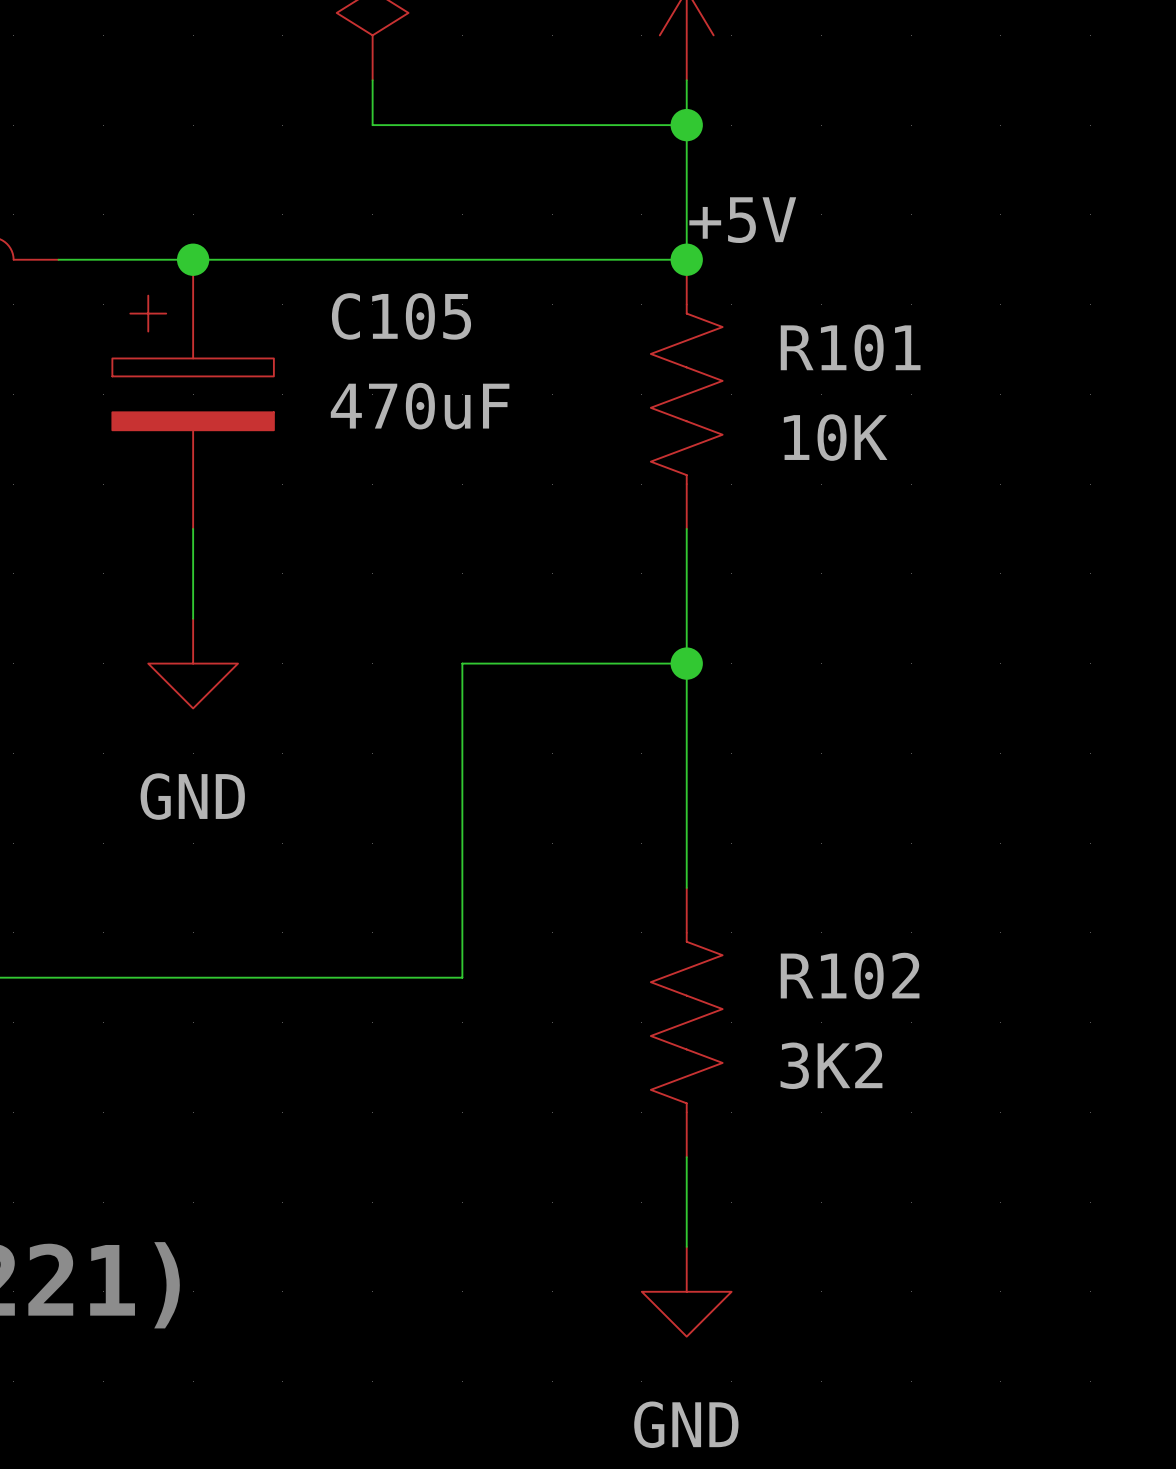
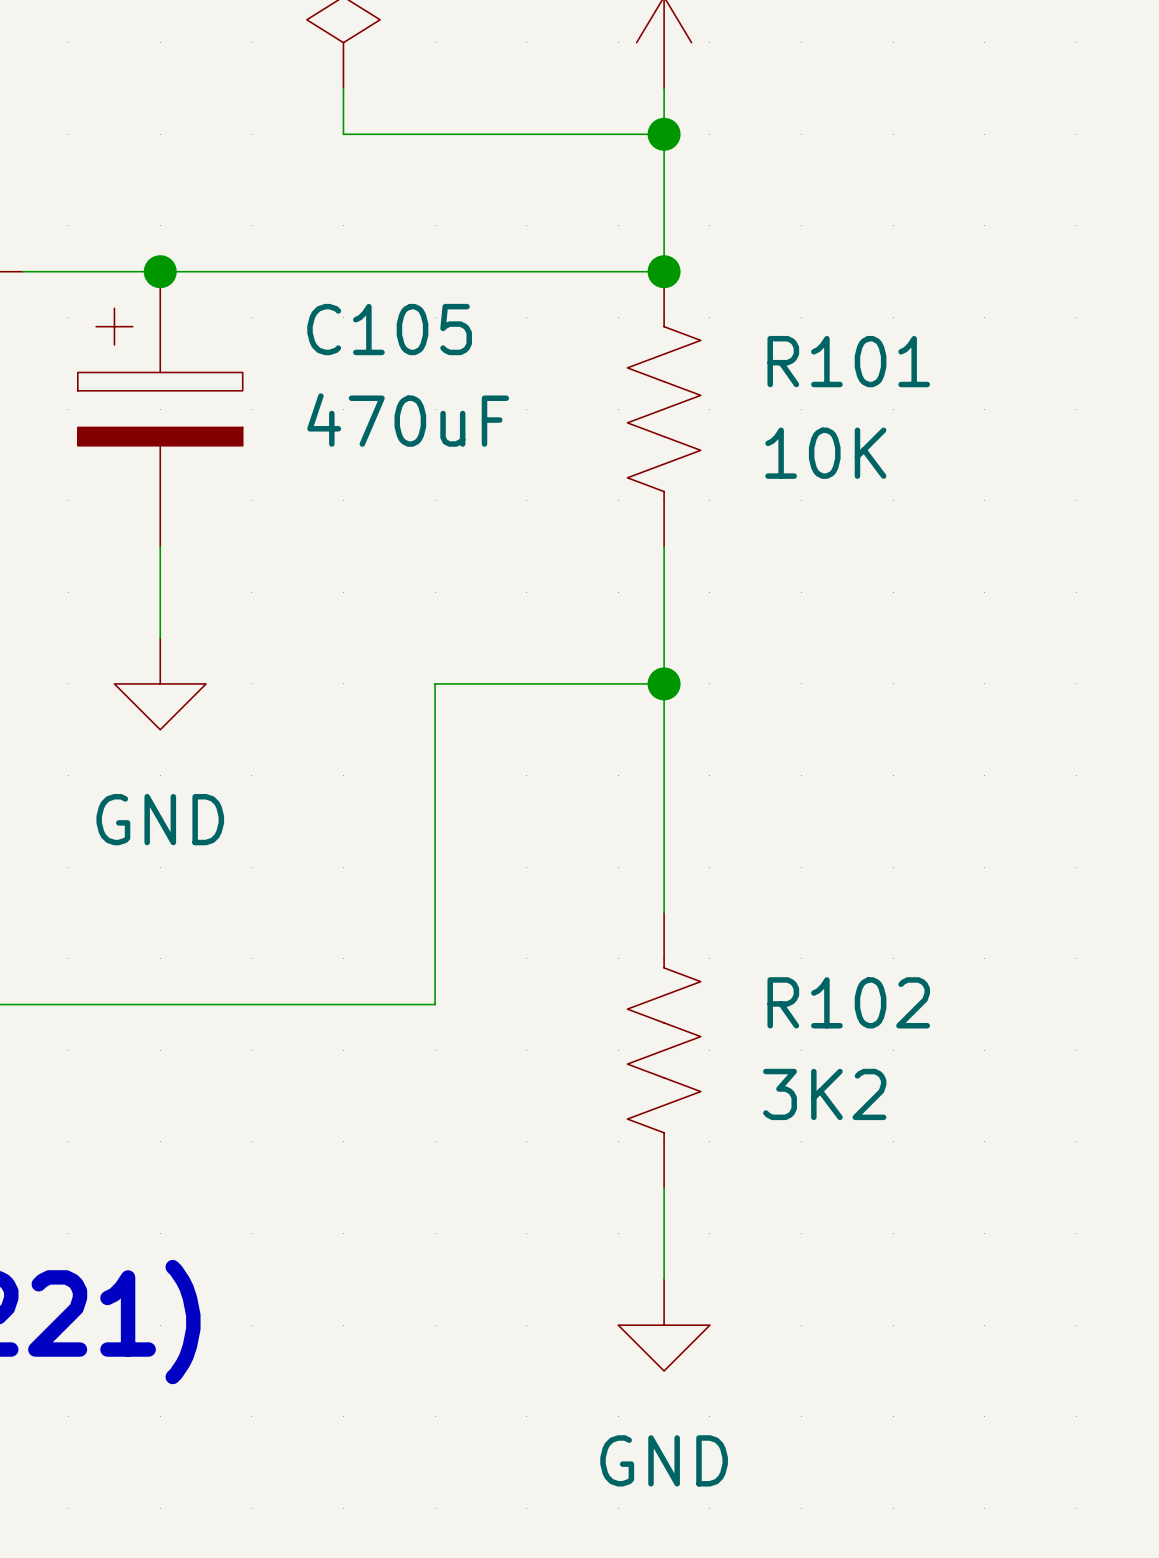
label: +5V (742, 220) -> none

